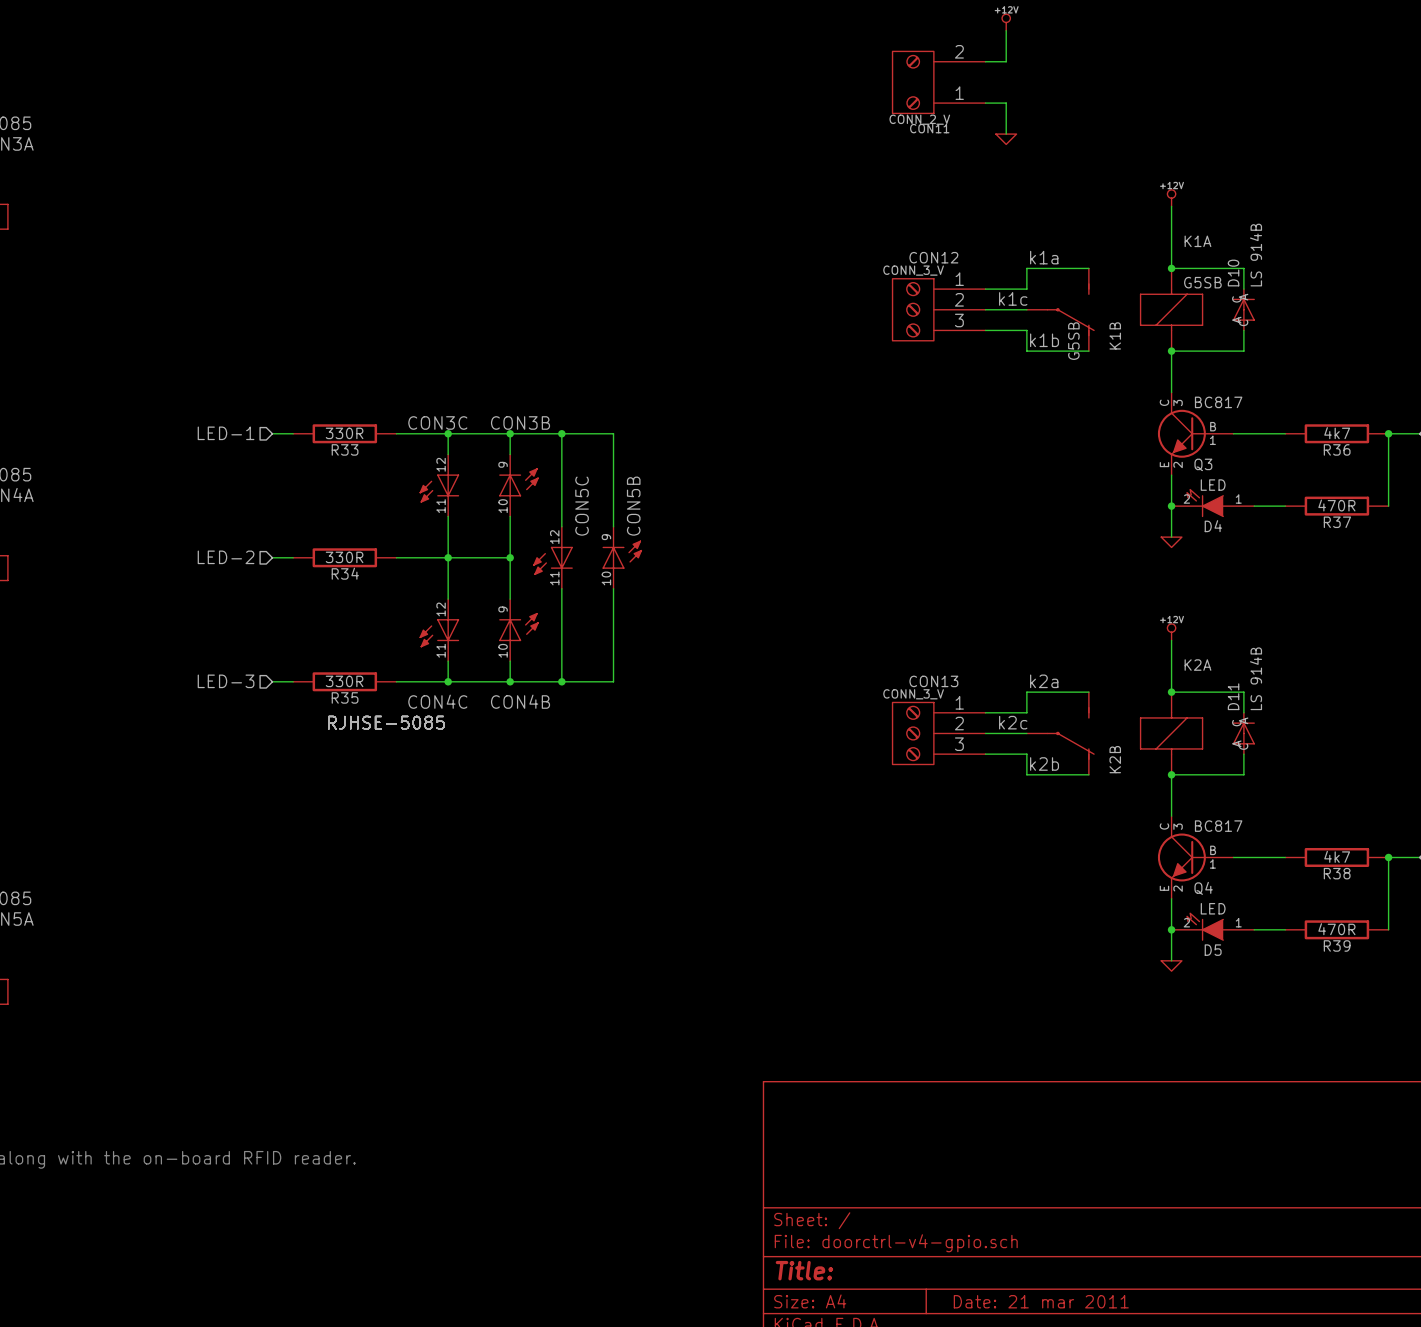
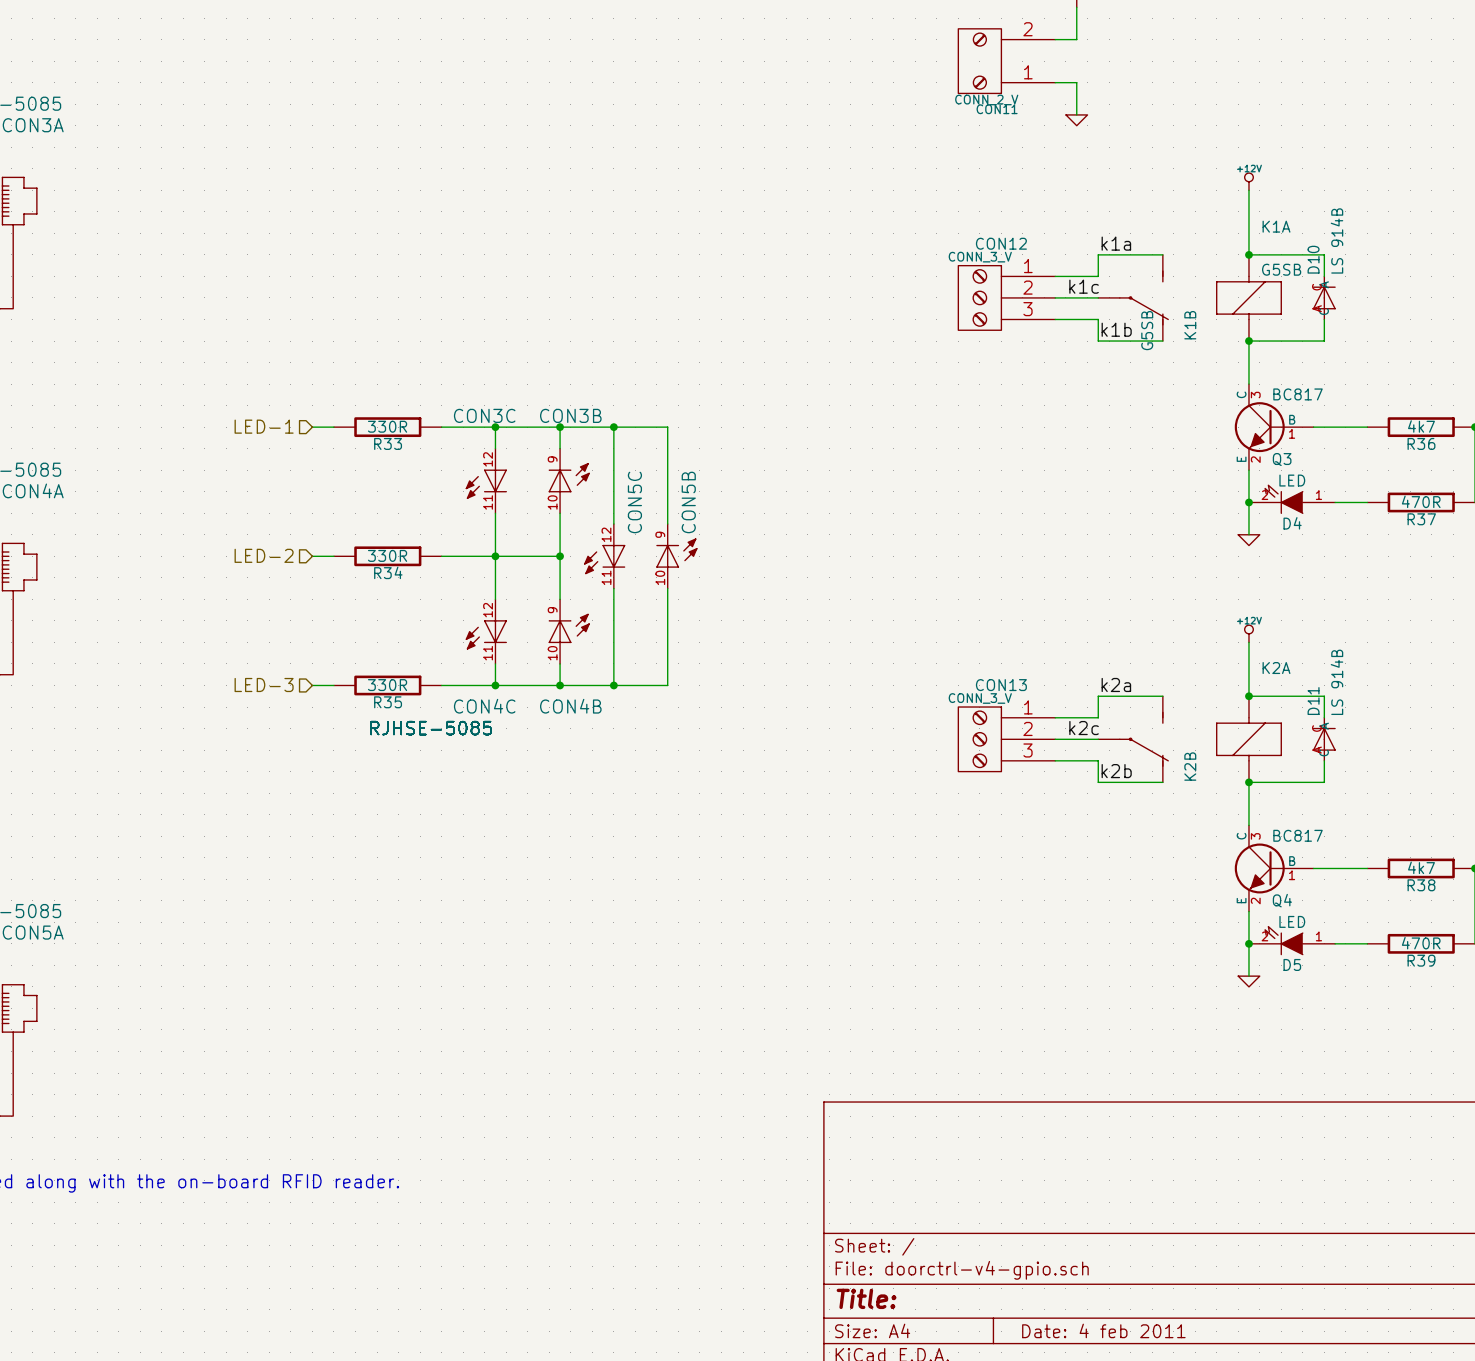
title block: Date: 21 mar 2011 (1041, 1301) -> Date: 4 feb 2011 (1103, 1330)

